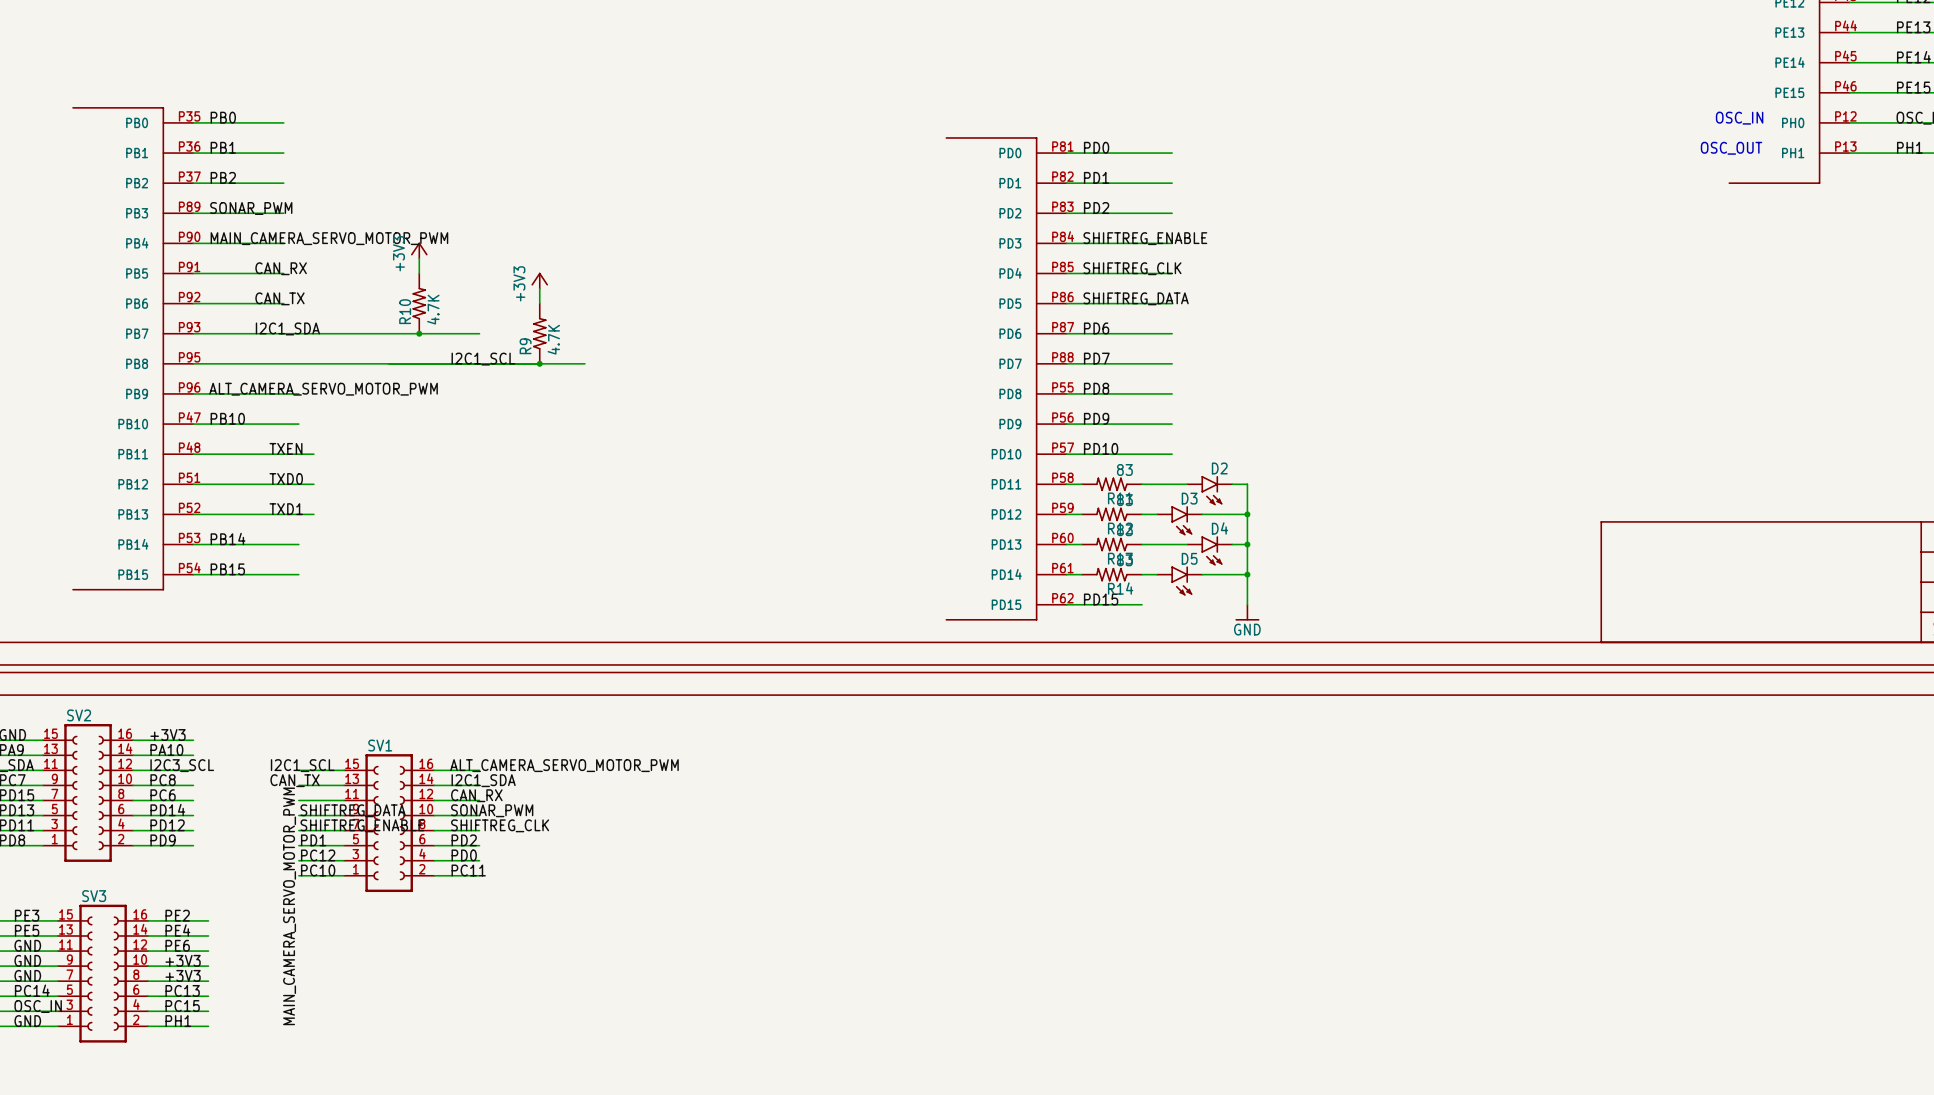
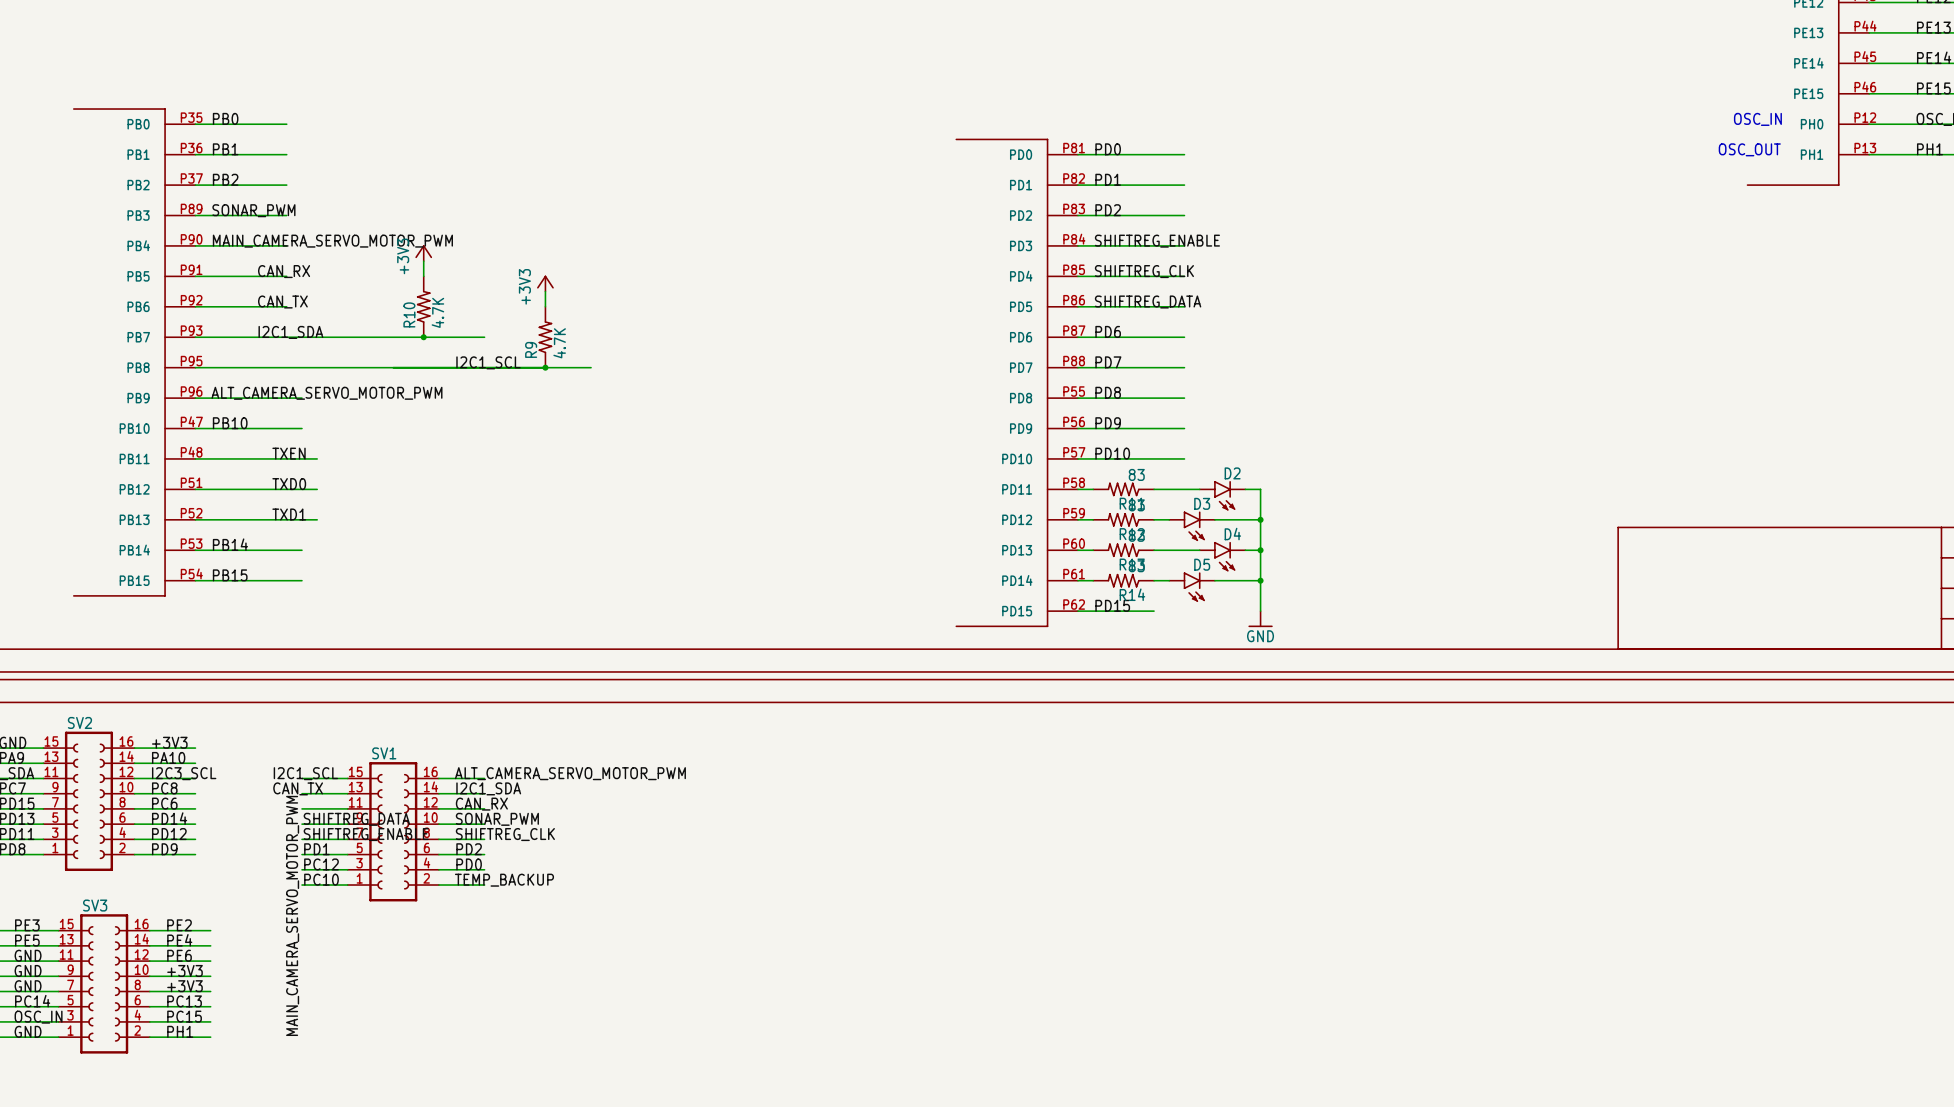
label: PC11 (468, 870) -> TEMP_BACKUP (504, 880)

